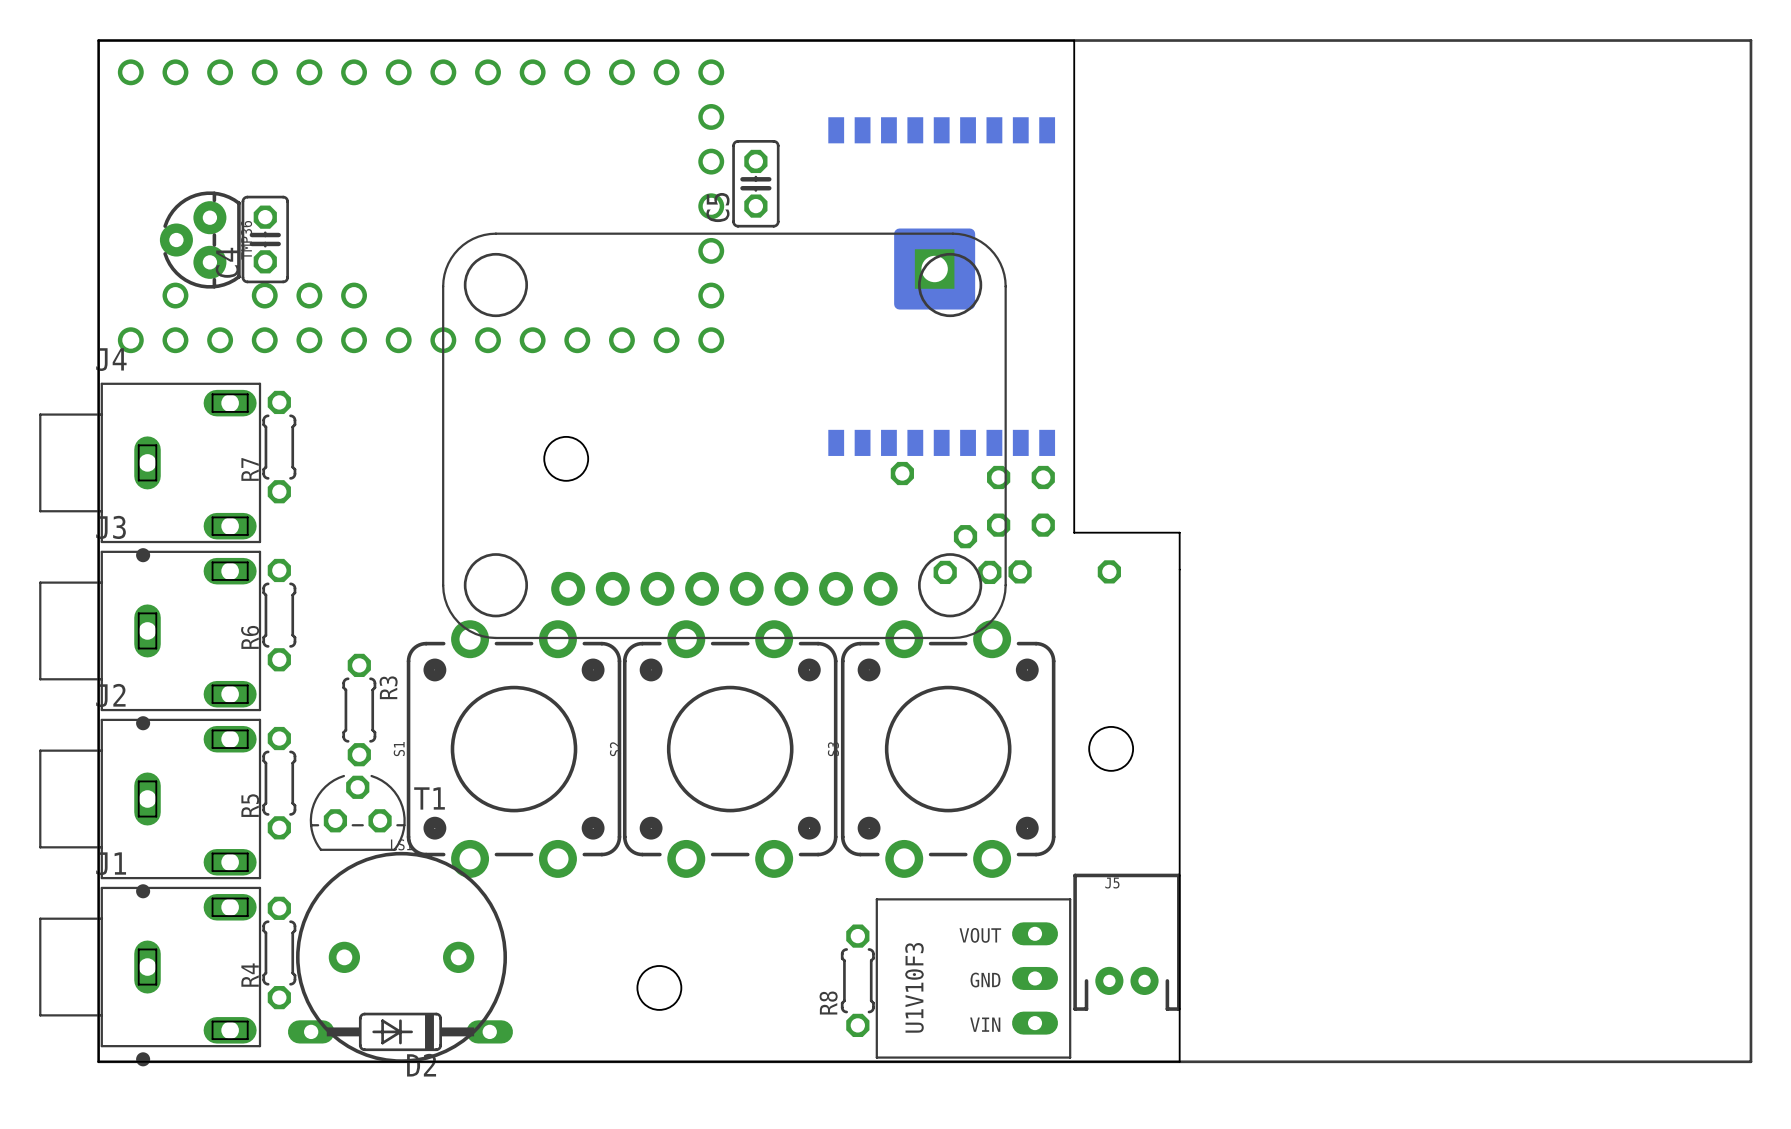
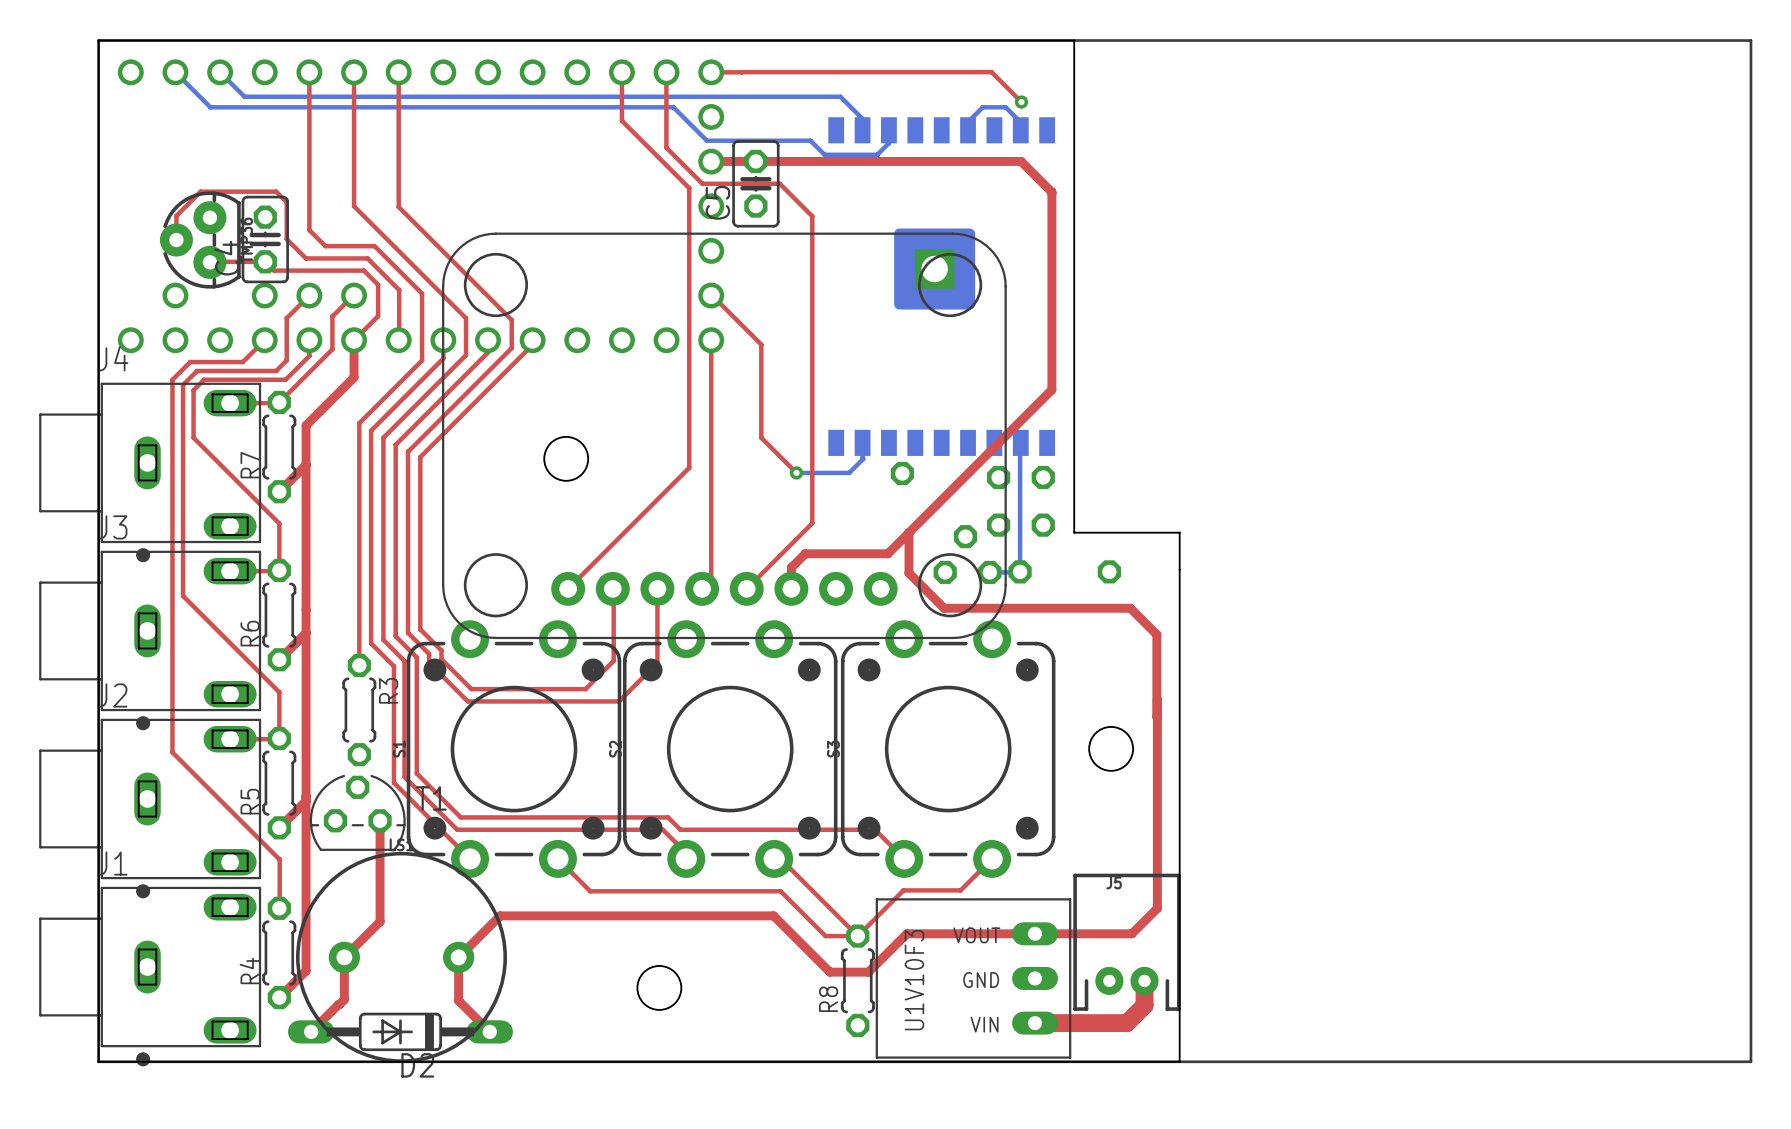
bottom track: none -> (175, 72) (210, 107) (673, 107) (706, 140) (810, 140) (824, 154) (877, 154) (888, 143) (888, 130)
bottom track: none -> (220, 72) (244, 96) (840, 96) (862, 118) (862, 130)
top track: none -> (309, 72) (309, 230) (325, 246) (374, 246) (422, 293) (422, 360) (359, 423) (359, 665)
top track: none -> (354, 72) (354, 206) (466, 318) (466, 355) (383, 437) (383, 639) (404, 661) (404, 777) (457, 829) (662, 829) (686, 853) (686, 858)
top track: none -> (398, 72) (398, 206) (511, 319) (511, 348) (408, 451) (408, 632) (429, 653) (429, 662) (467, 701) (618, 701) (657, 662)
top track: none -> (621, 72) (621, 120) (689, 188) (689, 467) (568, 588)
top track: none -> (666, 72) (666, 147) (702, 183) (779, 183) (812, 216) (812, 523) (746, 588)
top track: none -> (711, 72) (741, 72)
top track: none -> (741, 72) (991, 72) (1021, 102)
via: none -> (1021, 102)
bottom track: none -> (1021, 123) (1005, 107) (982, 107) (968, 122) (968, 130)
top track: none -> (711, 161) (1021, 161) (1051, 192) (1051, 389) (887, 553) (805, 553) (791, 567) (791, 588)
top track: none -> (176, 240) (176, 215) (200, 191) (276, 191) (286, 202) (286, 239) (306, 258) (367, 258) (399, 290) (398, 340)
top track: none -> (209, 262) (265, 261) (274, 270) (363, 270) (378, 284) (378, 316) (354, 340) (354, 377) (306, 425) (306, 970) (279, 997)
top track: none -> (309, 295) (286, 318) (286, 360) (276, 370) (197, 370) (183, 385) (183, 595) (279, 692) (278, 739) (230, 739)
top track: none -> (354, 295) (332, 316) (332, 349) (278, 403) (230, 403)
top track: none -> (711, 295) (761, 344) (761, 437) (796, 472)
top track: none -> (264, 340) (242, 362) (190, 362) (172, 379) (172, 752) (279, 859) (279, 908)
top track: none -> (309, 340) (309, 356) (285, 379) (204, 379) (193, 390) (193, 437) (279, 523) (278, 571) (230, 571)
top track: none -> (443, 340) (443, 358) (371, 430) (371, 643) (393, 666) (393, 782) (470, 858)
top track: none -> (487, 340) (487, 352) (395, 444) (395, 636) (416, 657) (416, 773) (460, 817) (668, 817) (680, 829) (875, 829) (904, 858)
top track: none -> (532, 340) (532, 344) (420, 457) (420, 629) (441, 650) (441, 659) (471, 689) (585, 689) (613, 661) (612, 588)
top track: none -> (711, 340) (711, 579) (702, 588)
bottom track: none -> (862, 442) (863, 458) (849, 472) (796, 472)
bottom track: none -> (1020, 442) (1020, 571) (989, 572)
top track: none -> (306, 465) (279, 491)
via: none -> (796, 472)
top track: none -> (908, 532) (908, 573) (944, 608) (1130, 608) (1156, 634) (1157, 717)
top track: none -> (657, 588) (657, 662)
top track: none -> (306, 633) (279, 659)
top track: none -> (1157, 698) (1157, 908) (1131, 933) (906, 933) (868, 972) (829, 972) (773, 915) (500, 915) (458, 957) (458, 1000) (489, 1031)
top track: none -> (306, 801) (279, 827)
top track: none -> (380, 820) (380, 921) (344, 957) (344, 999) (311, 1031)
top track: none -> (557, 858) (590, 891) (780, 891) (825, 936) (857, 936)
top track: none -> (774, 858) (780, 858) (857, 936)
top track: none -> (992, 858) (960, 890) (903, 890) (857, 936)
top track: none -> (1144, 980) (1144, 1005) (1126, 1023) (1035, 1023)

